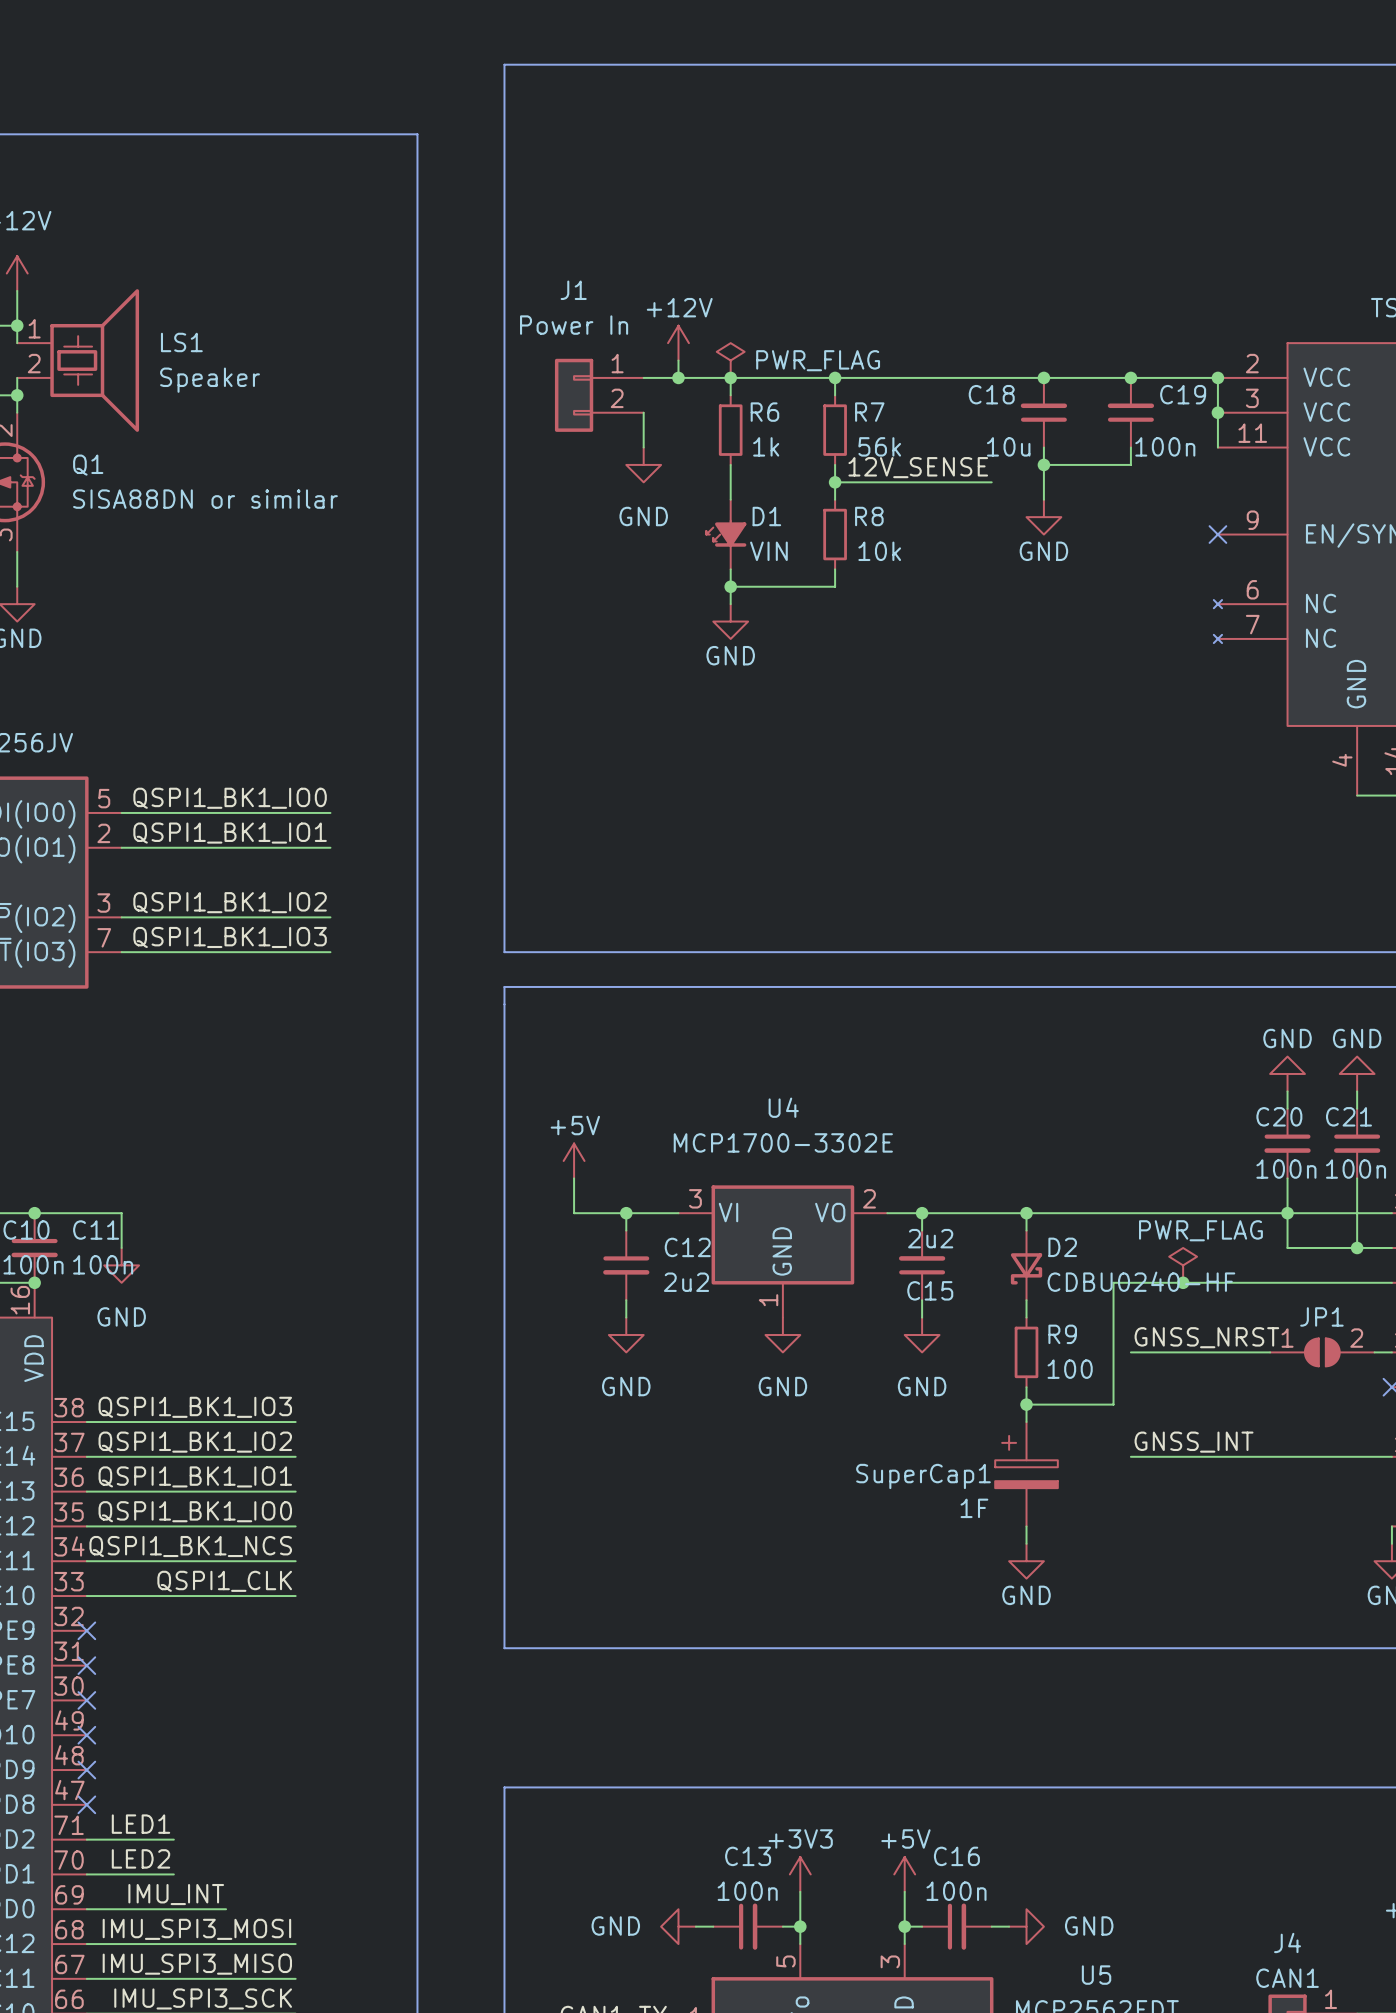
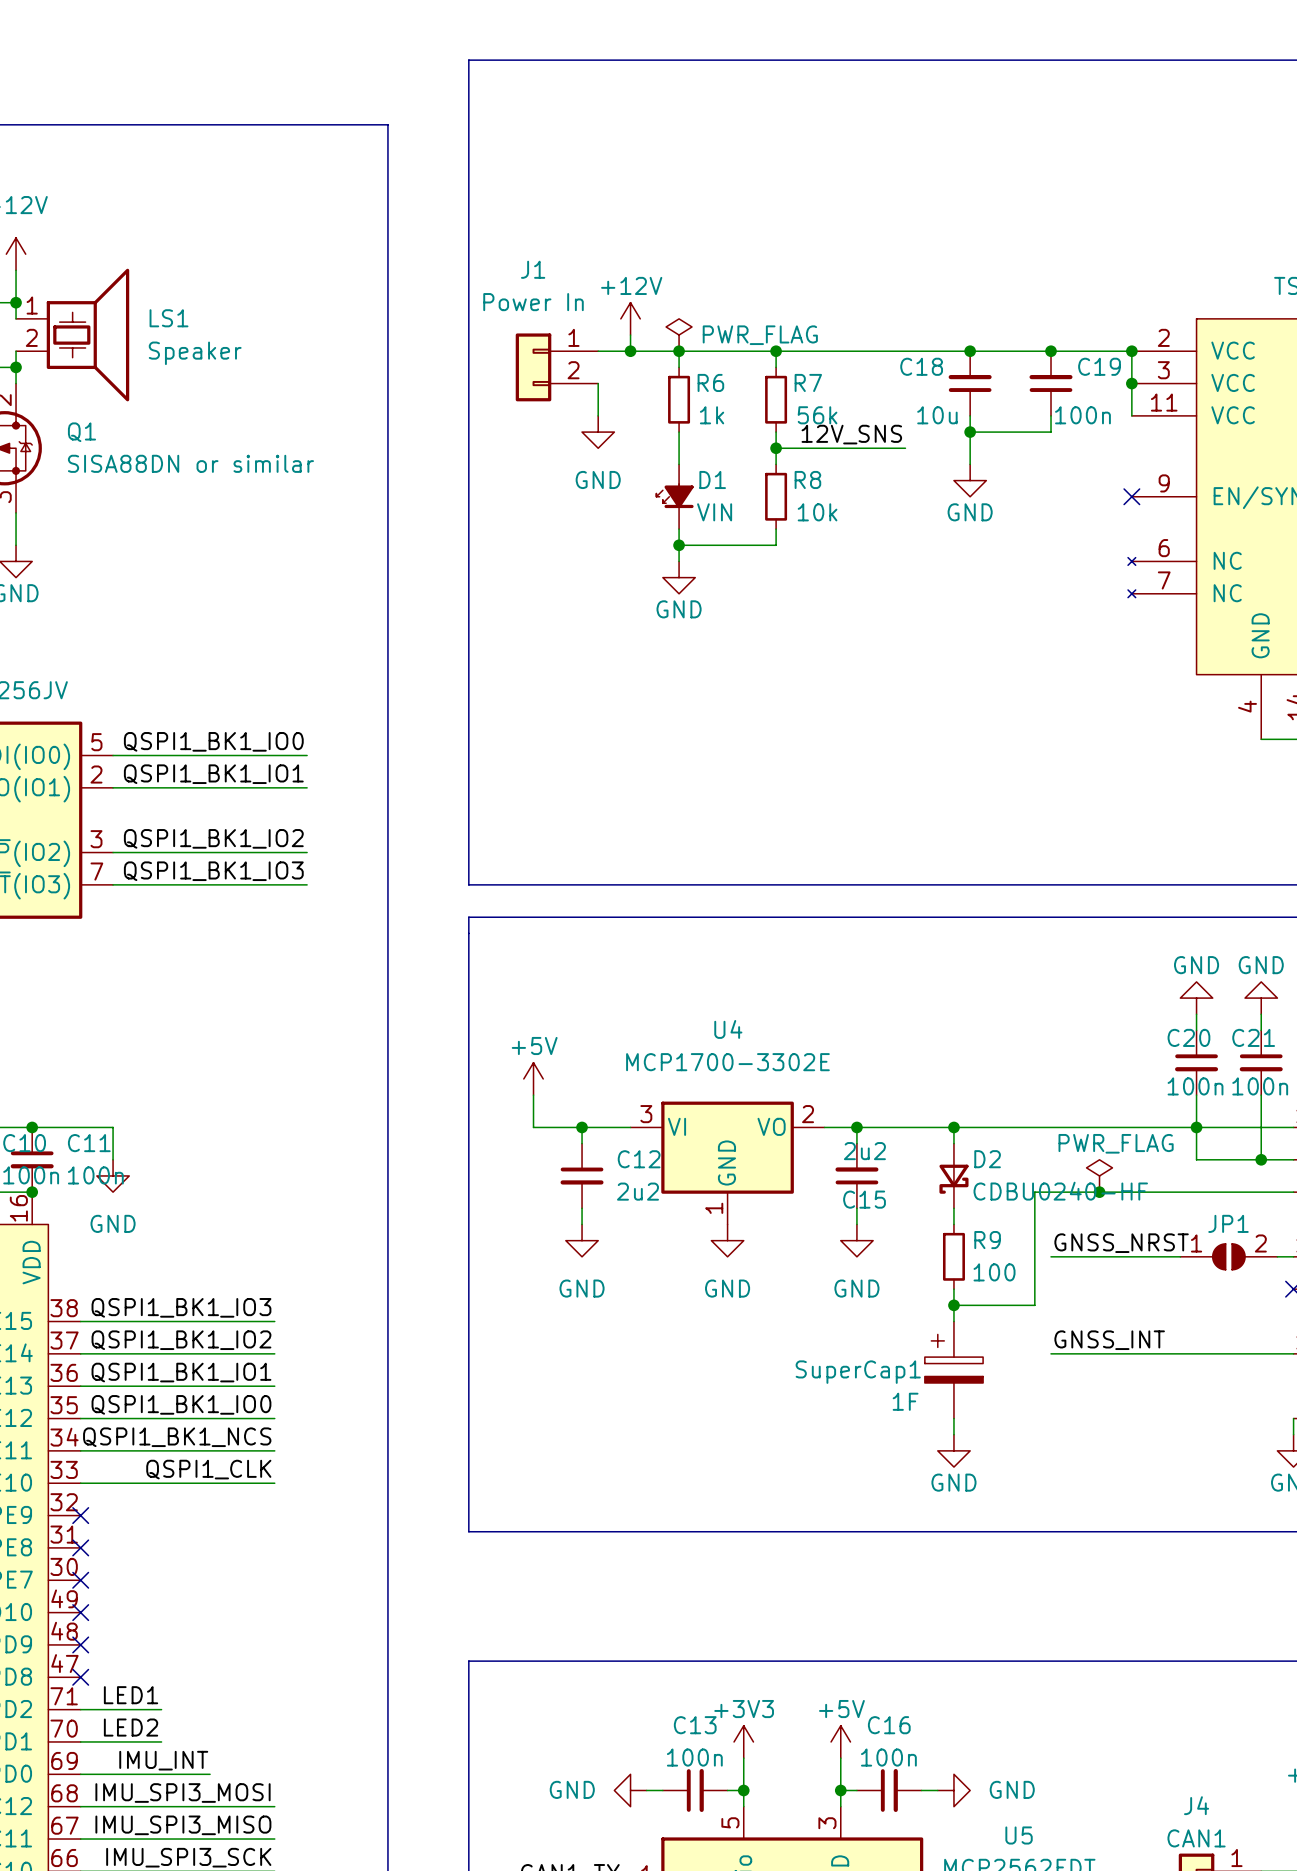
label: 12V_SENSE (918, 467) -> 12V_SNS (851, 434)
wire: (974, 482) (991, 482) -> none

